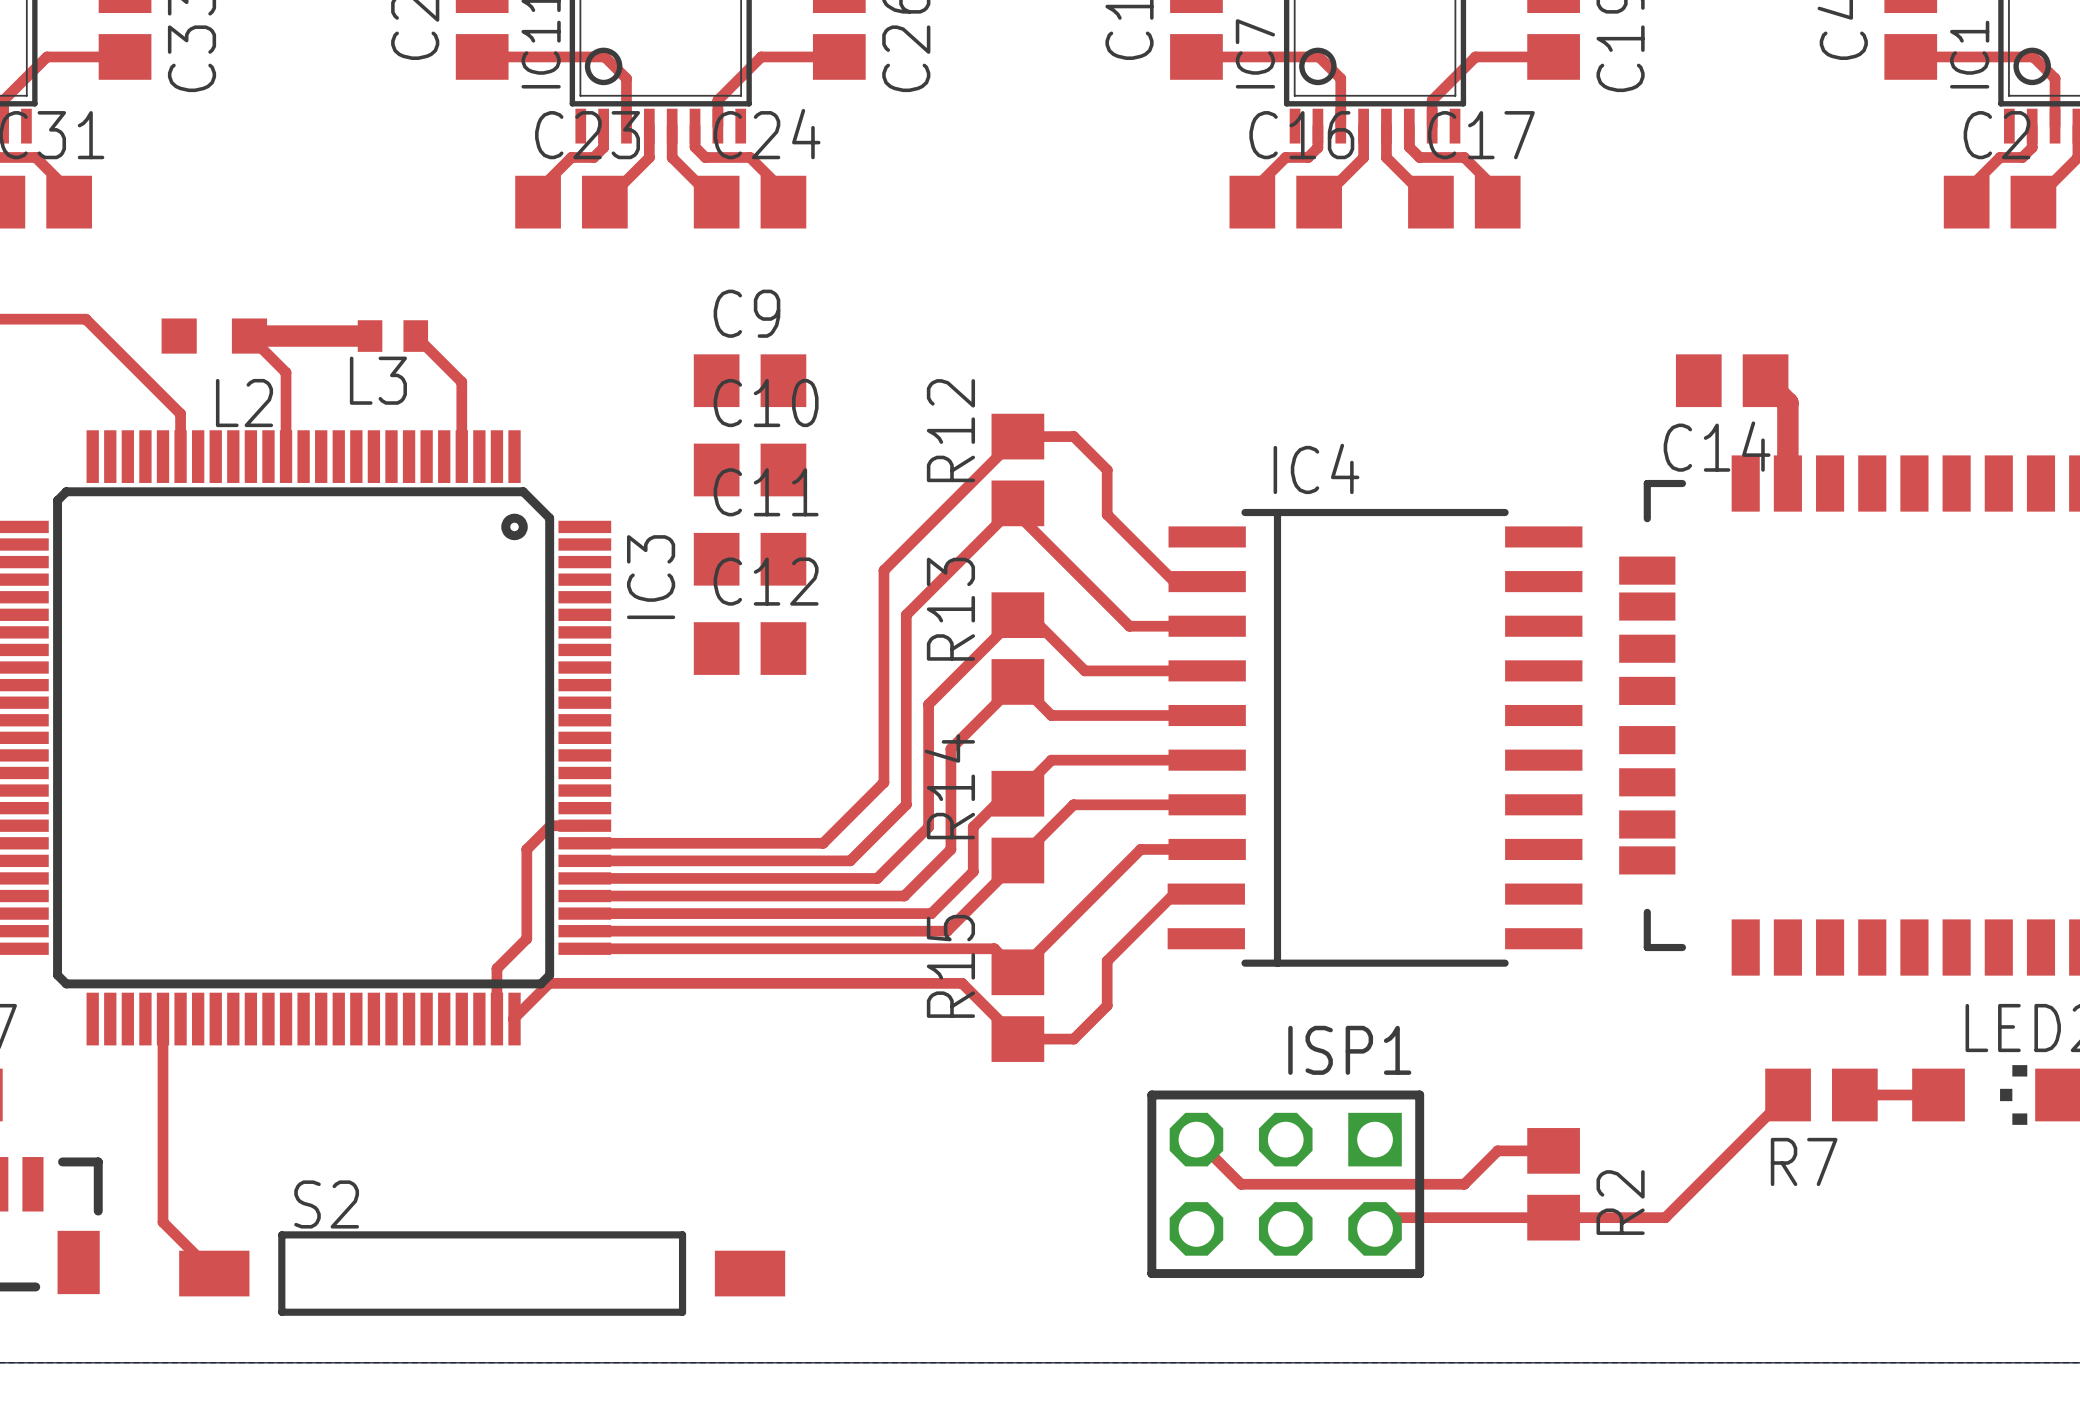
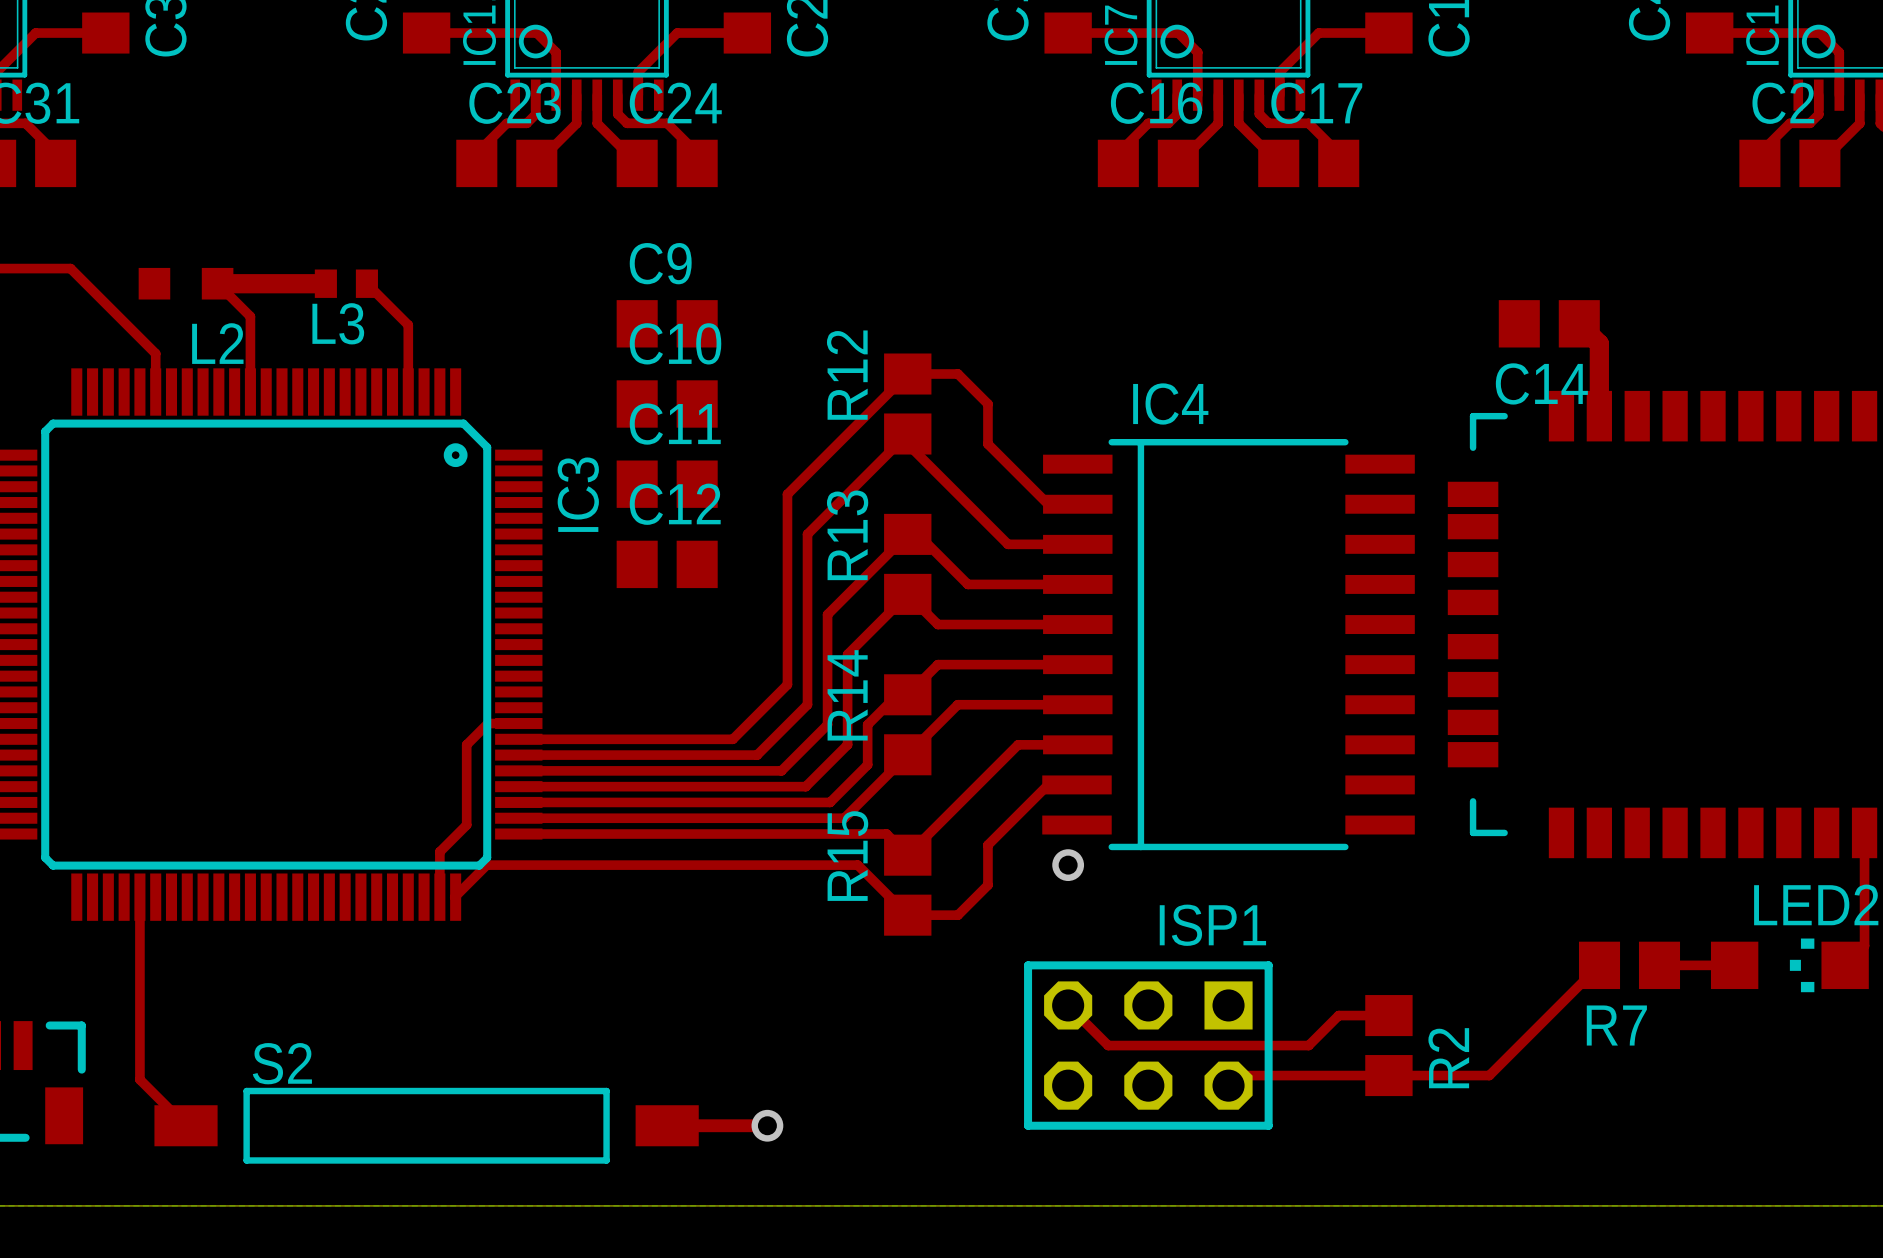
via: none -> (1068, 865)
top track: none -> (667, 1125) (767, 1125)
via: none -> (767, 1125)

